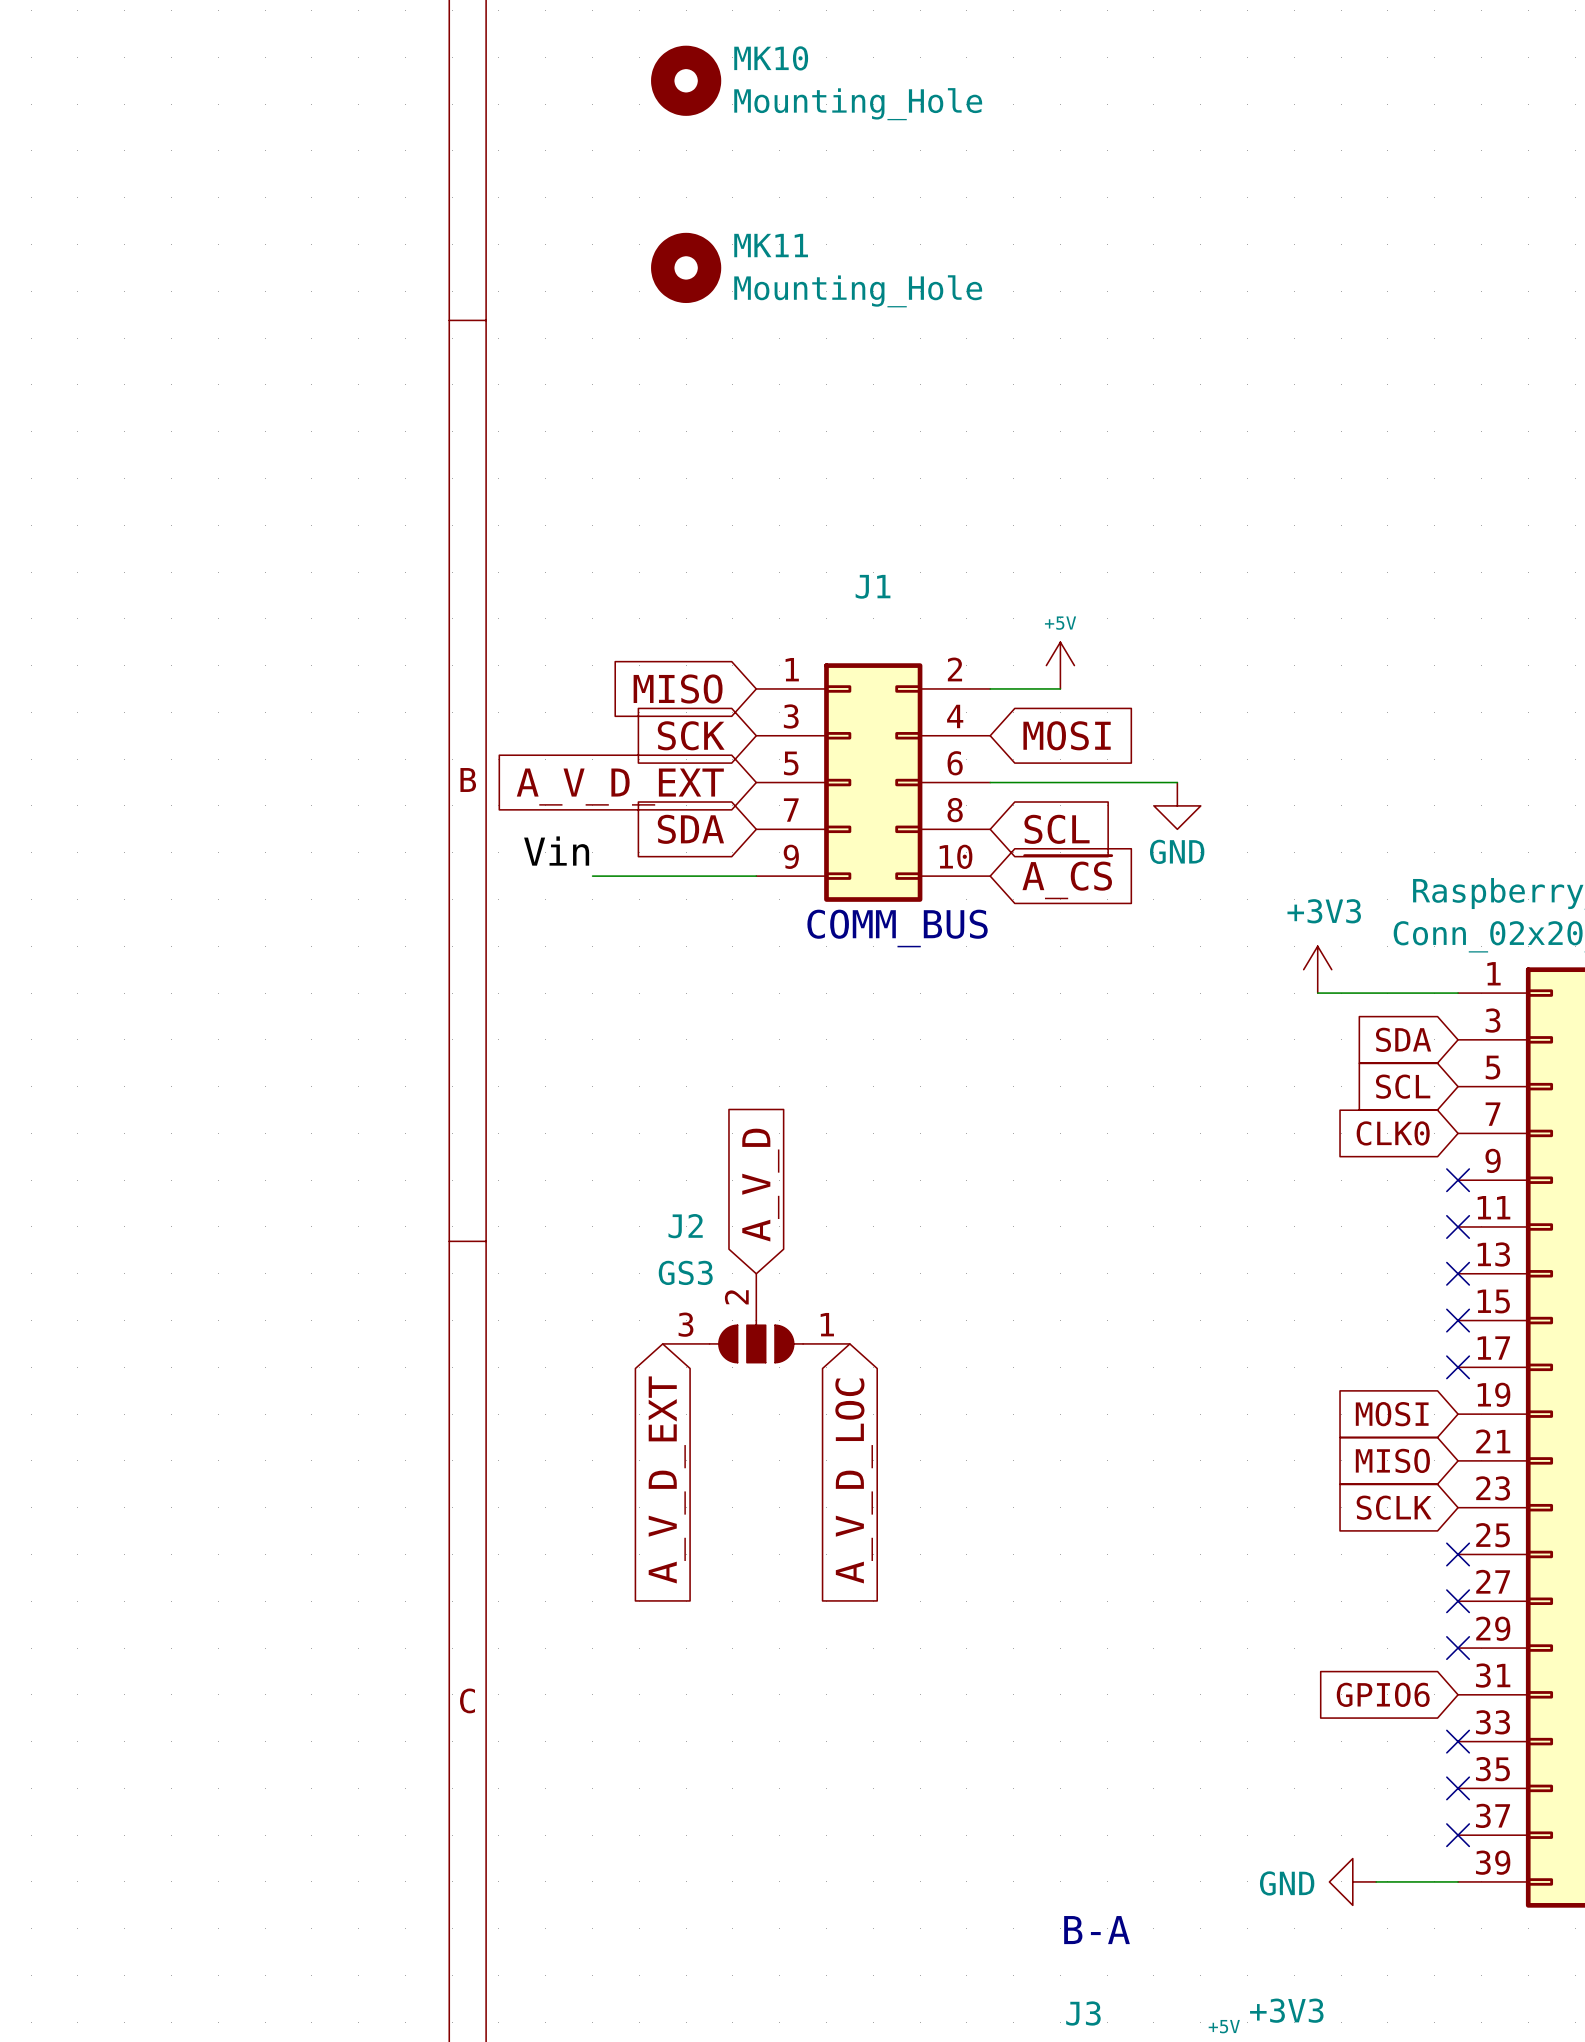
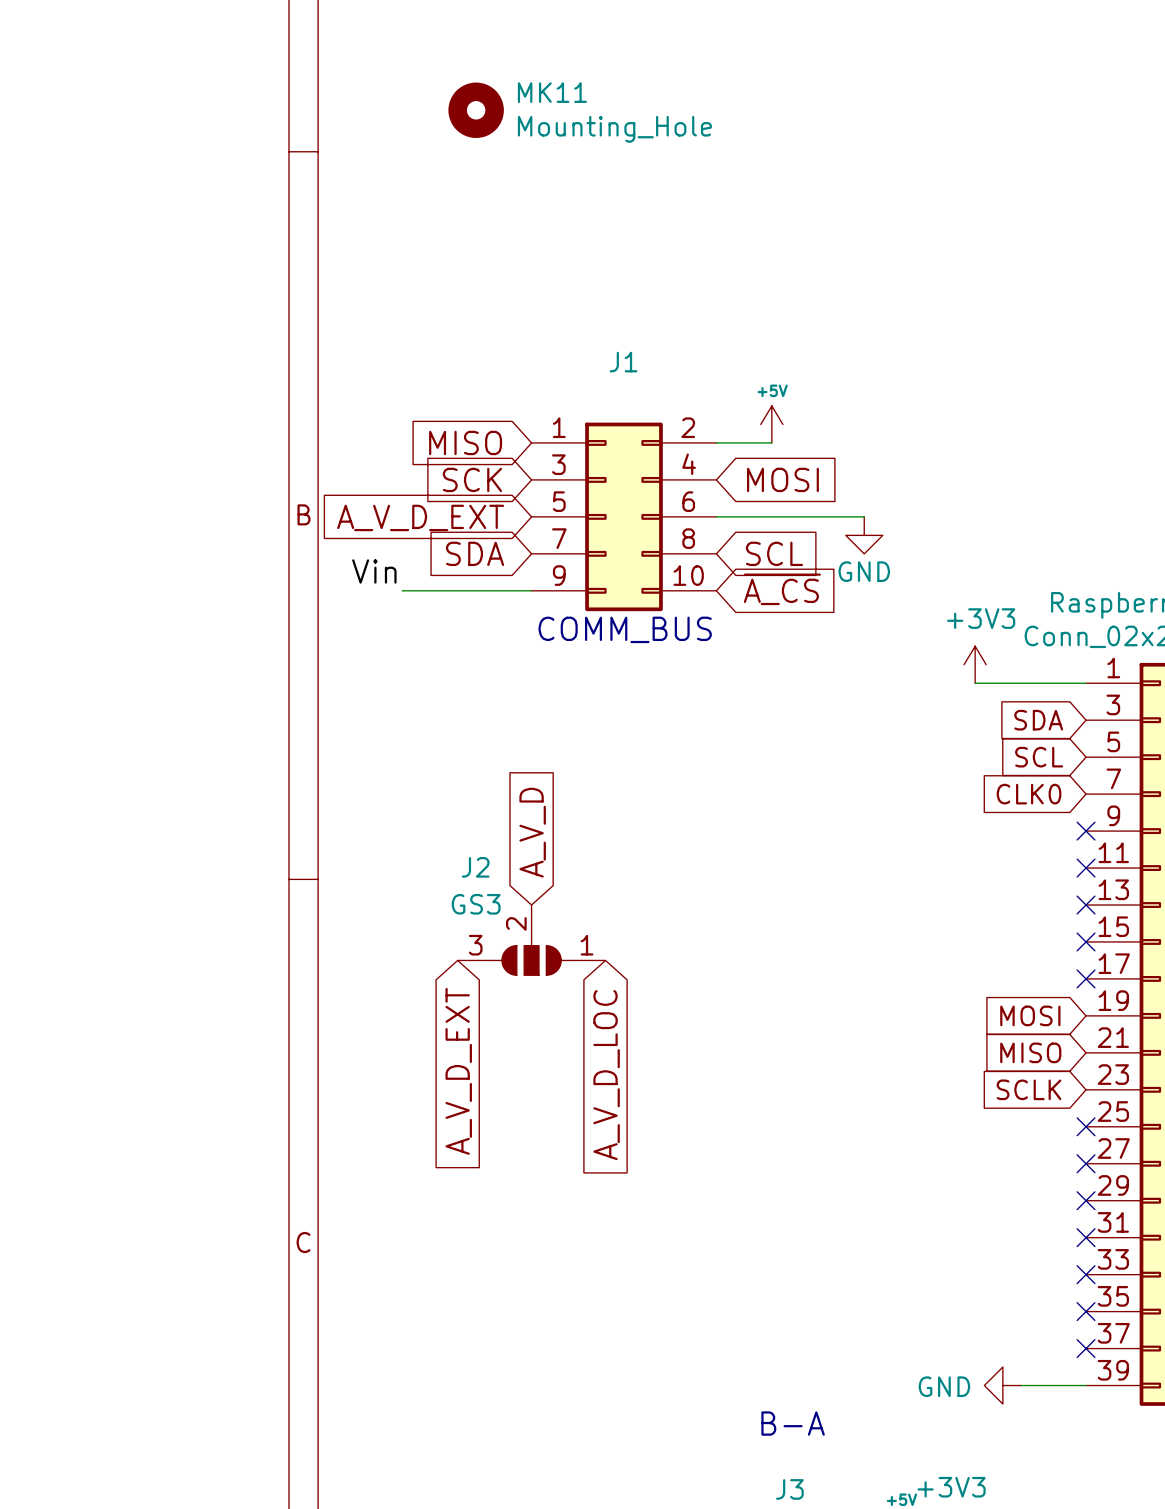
global label: GPIO6 (1383, 1694) -> none
no-connect mark: none -> (1086, 1237)

